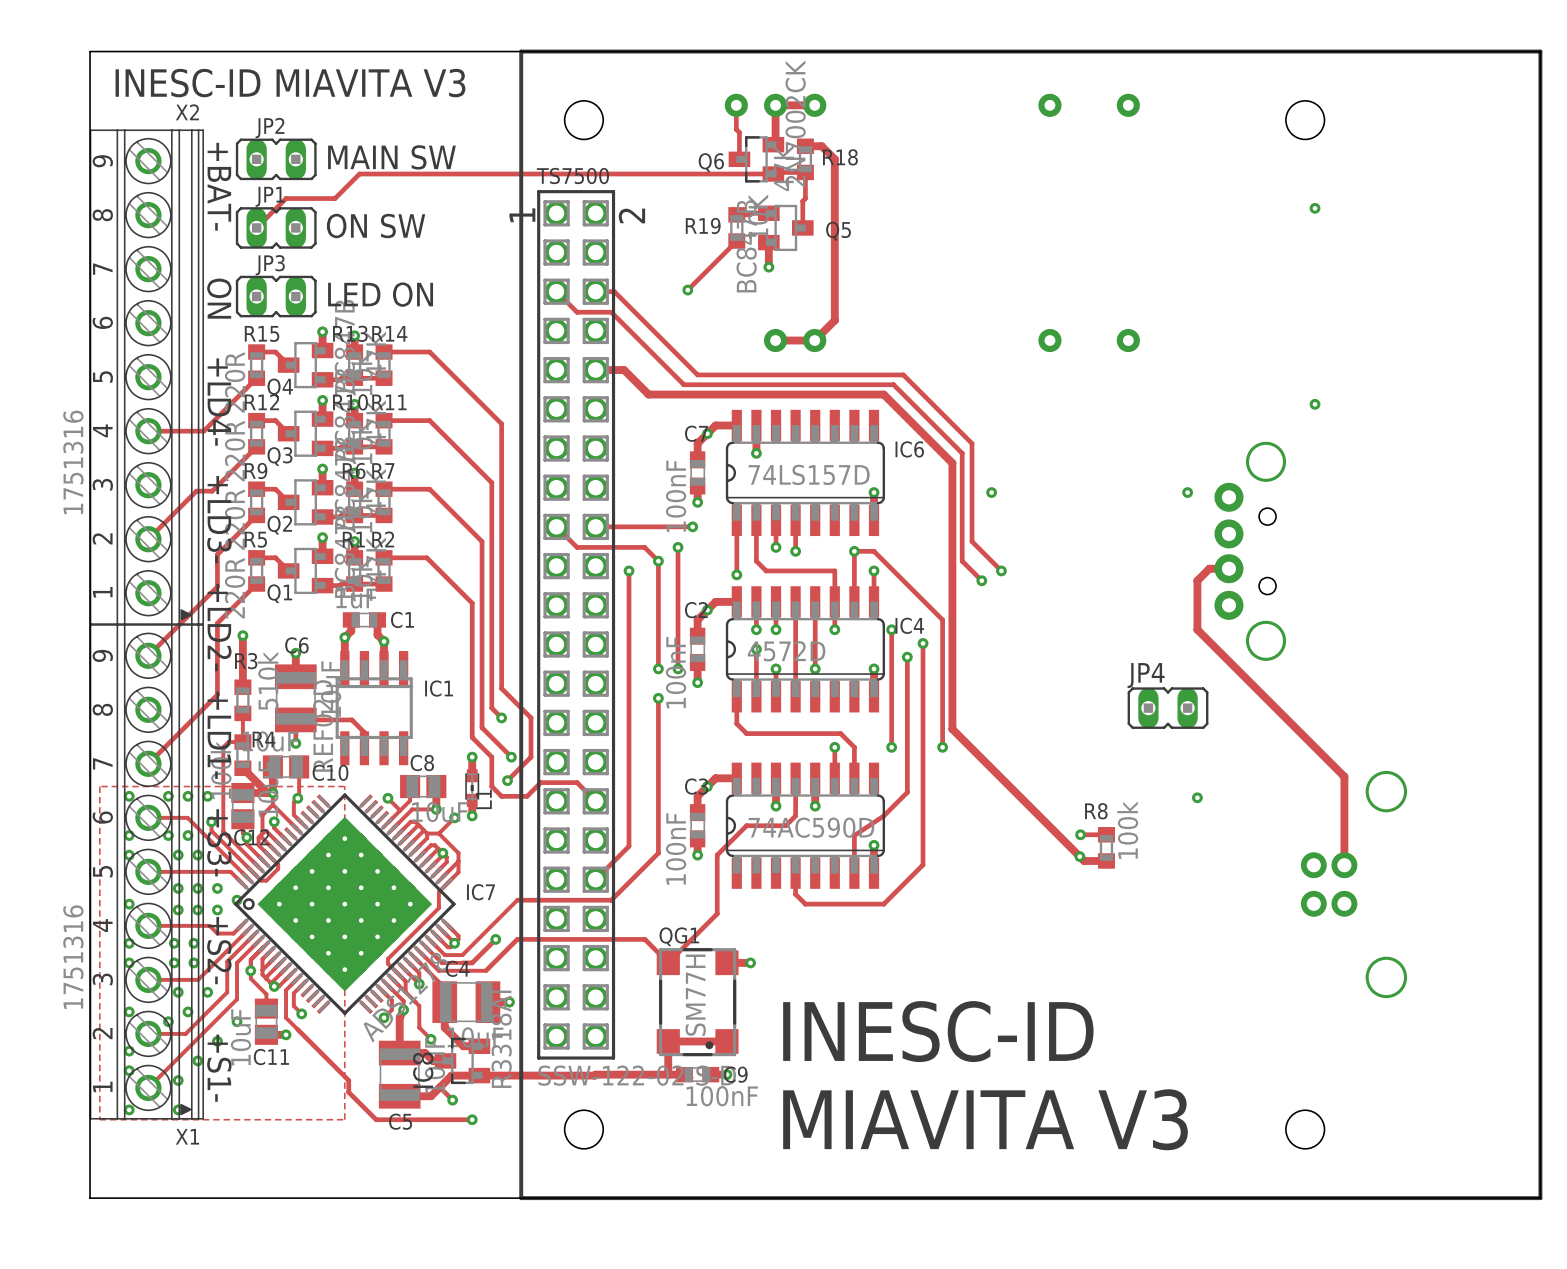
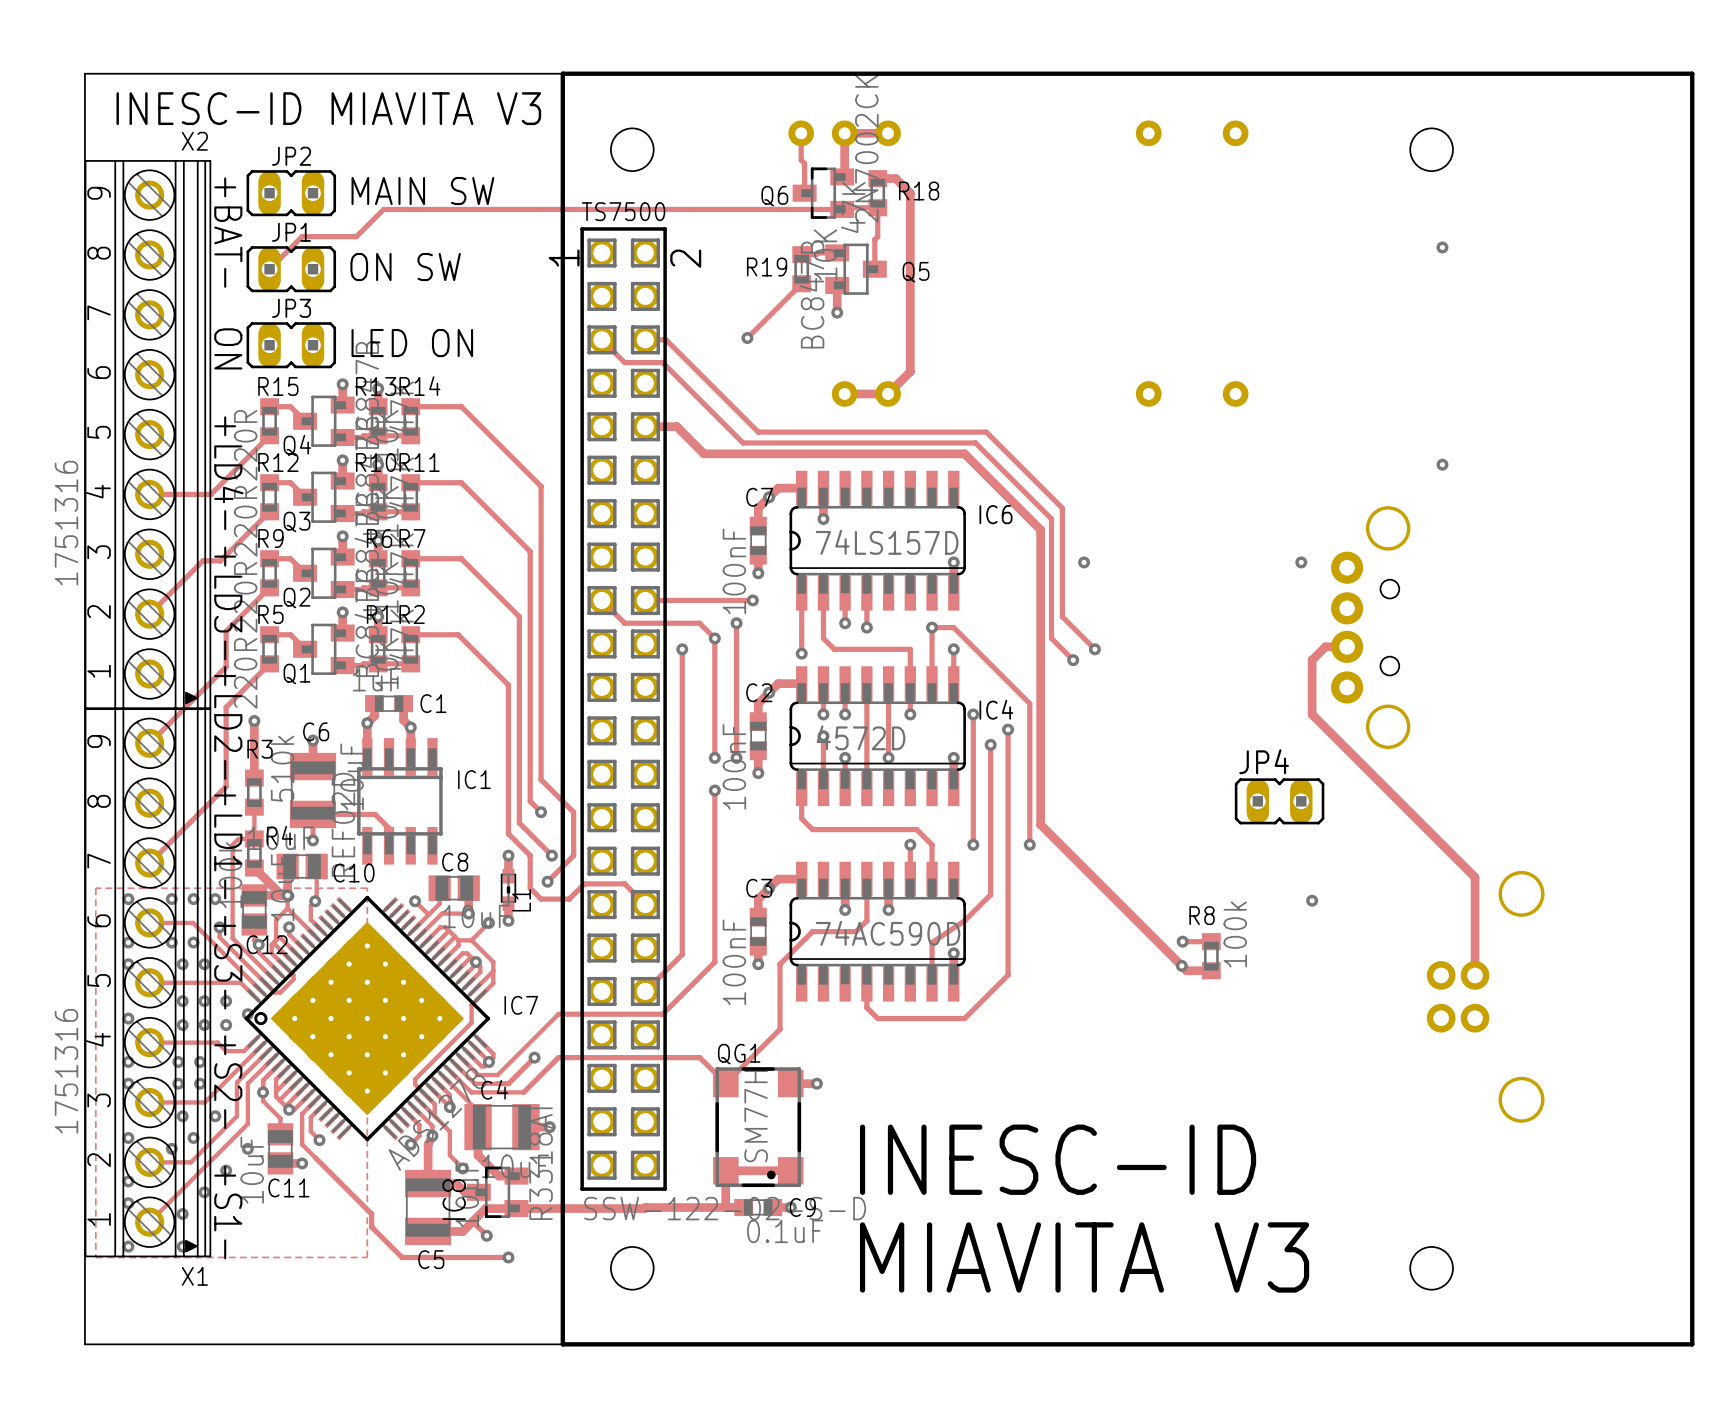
C9 value: 100nF (722, 1096) -> 0.1uF (785, 1231)

